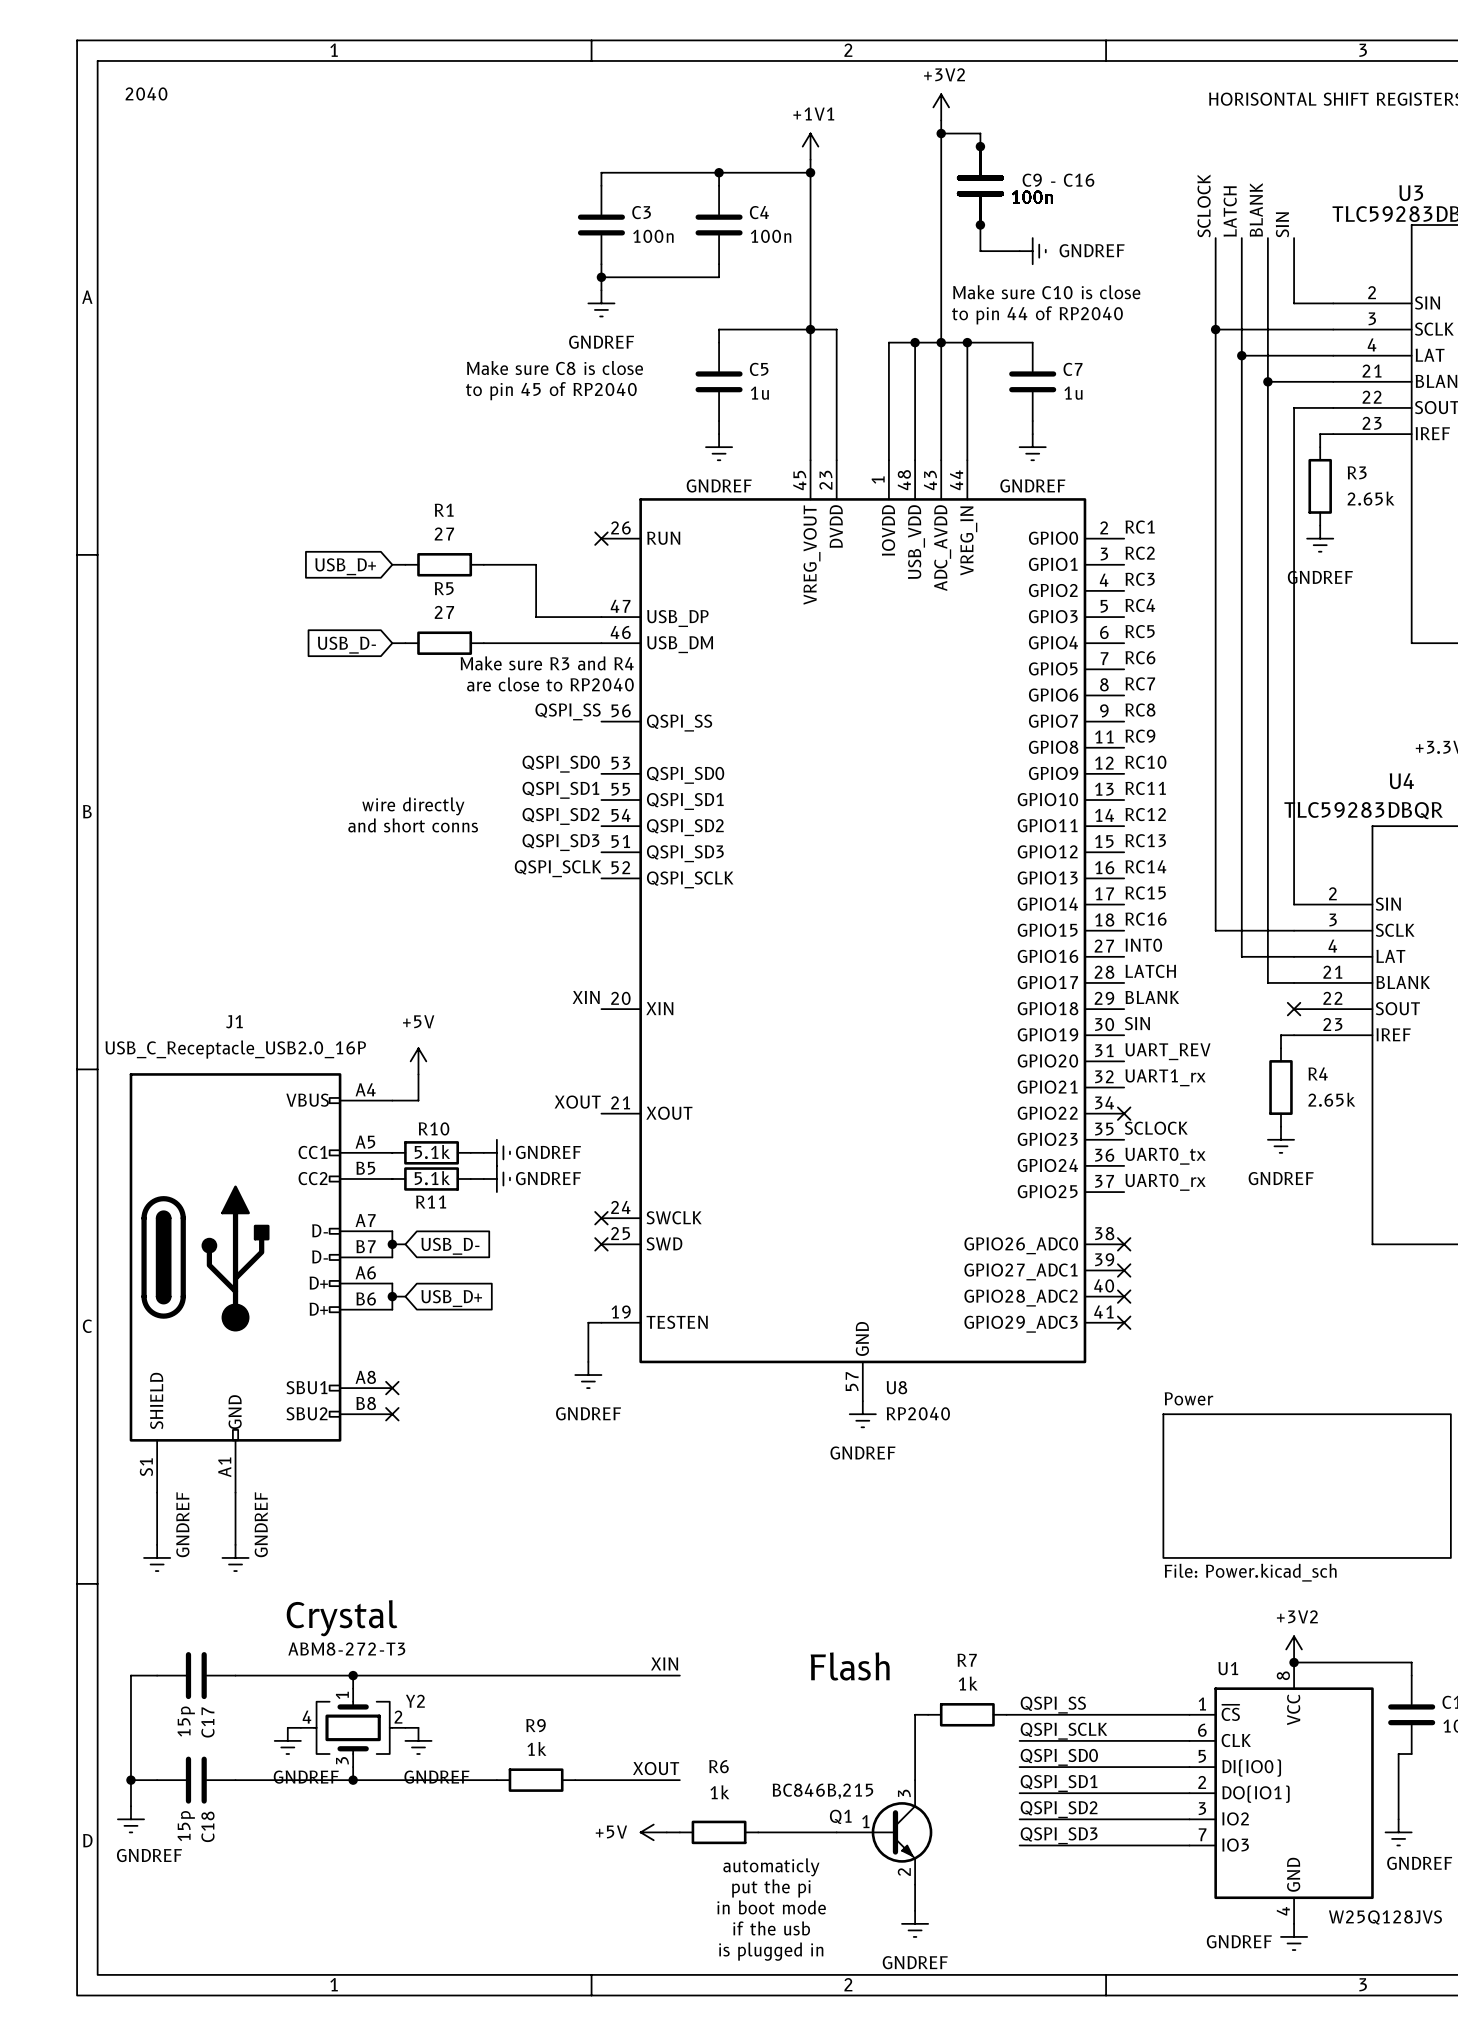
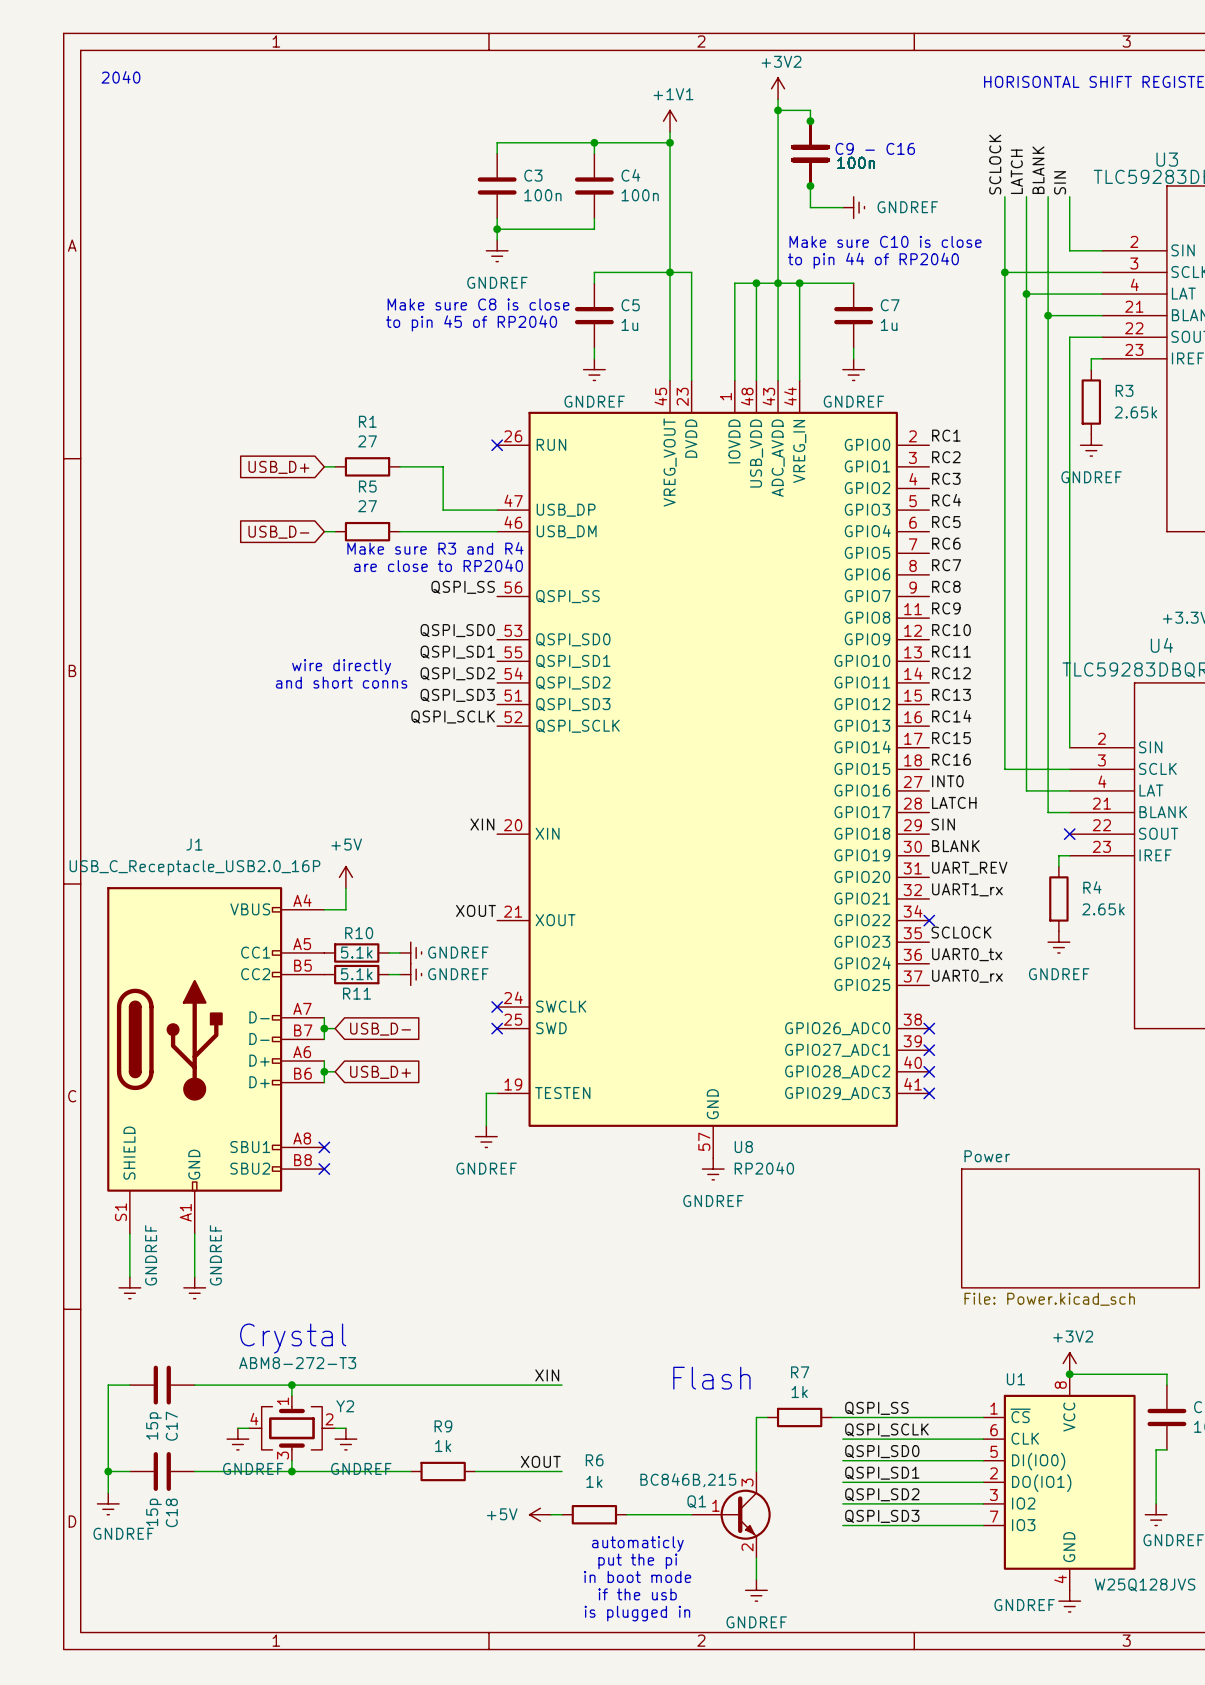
label: BLANK (1152, 997) -> SIN (943, 824)
label: SIN (1137, 1023) -> BLANK (955, 846)

